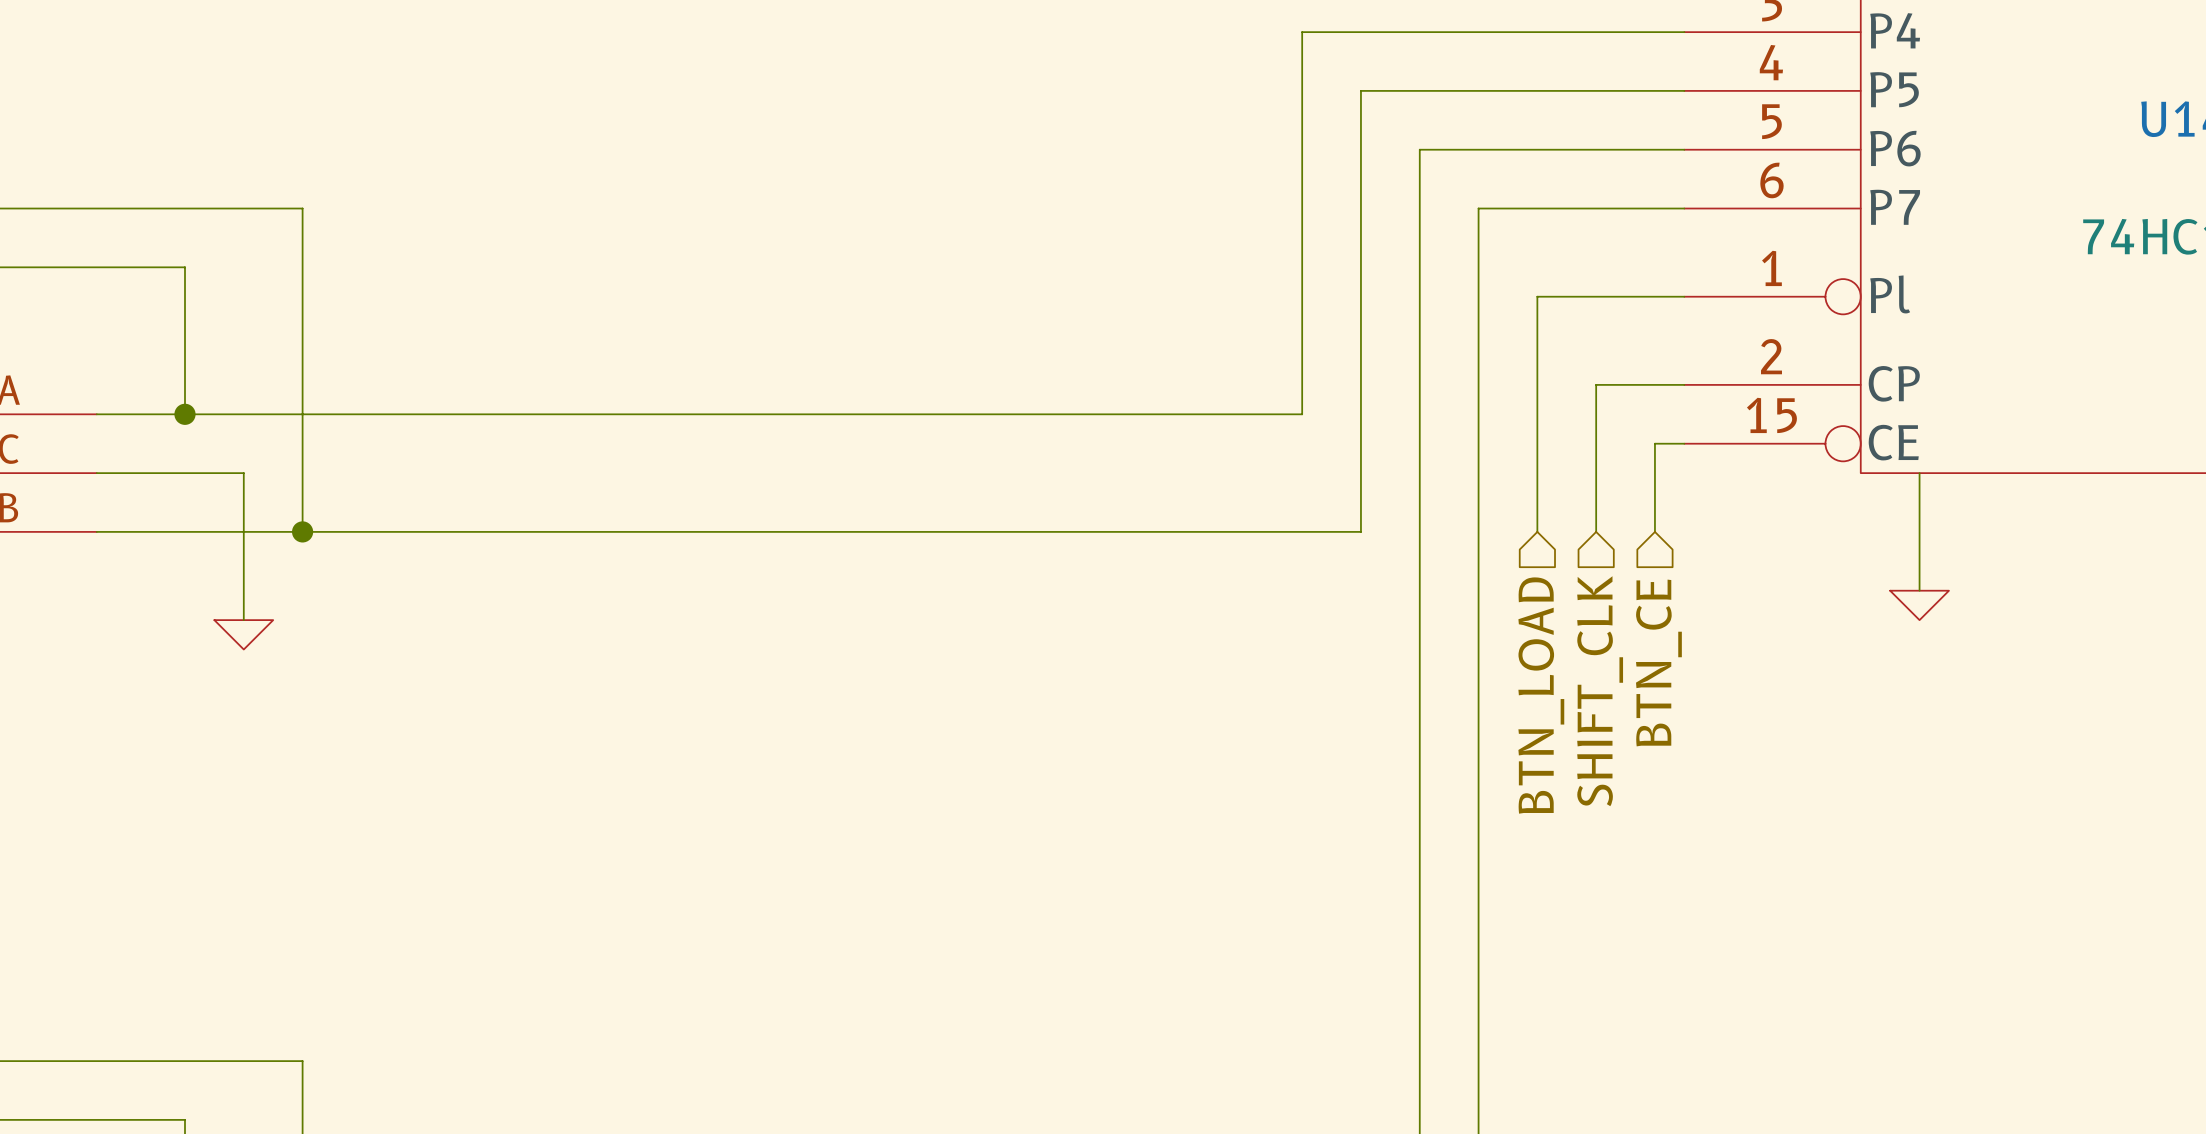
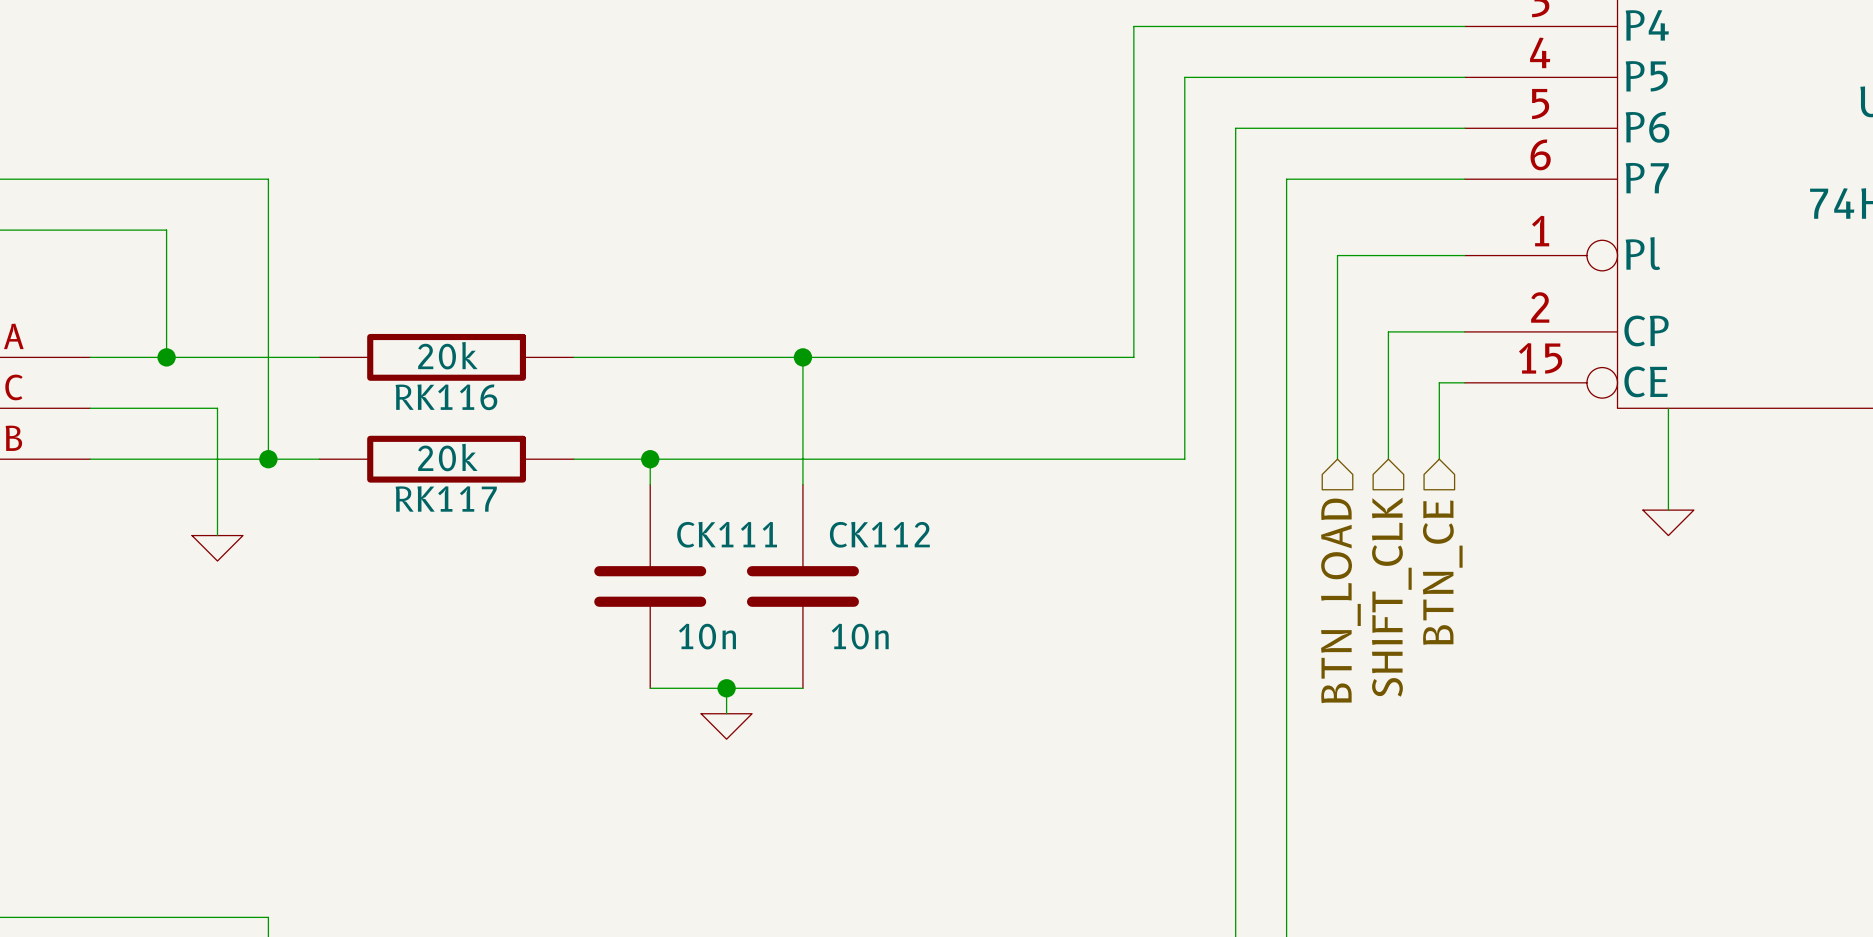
wire: (361, 414) (655, 414) -> none
RK116: none -> 20k (446, 357)
wire: none -> (802, 357) (802, 484)
junction: none -> (802, 357)
wire: (361, 531) (655, 531) -> none
RK117: none -> 20k (446, 459)
wire: none -> (650, 459) (650, 484)
junction: none -> (650, 459)
CK111: none -> 10n (650, 586)
CK112: none -> 10n (802, 586)
wire: none -> (650, 688) (802, 688)
wire: none -> (726, 688) (726, 713)
junction: none -> (726, 688)
power symbol: none -> (726, 726)

